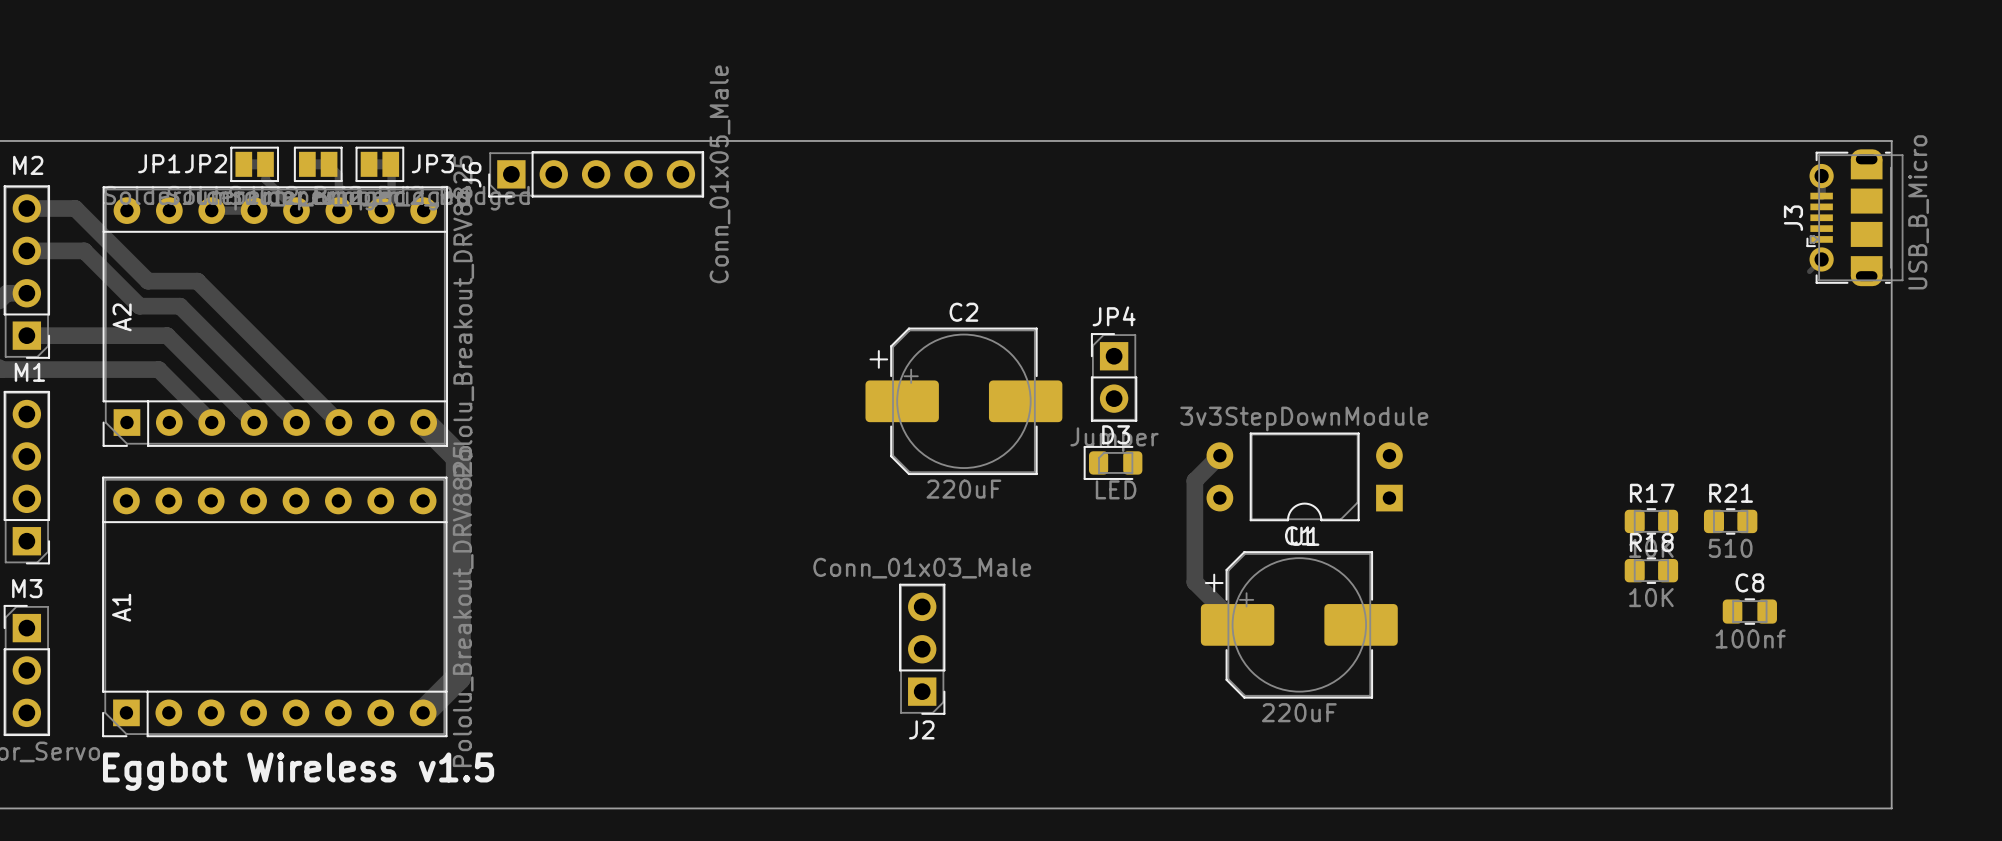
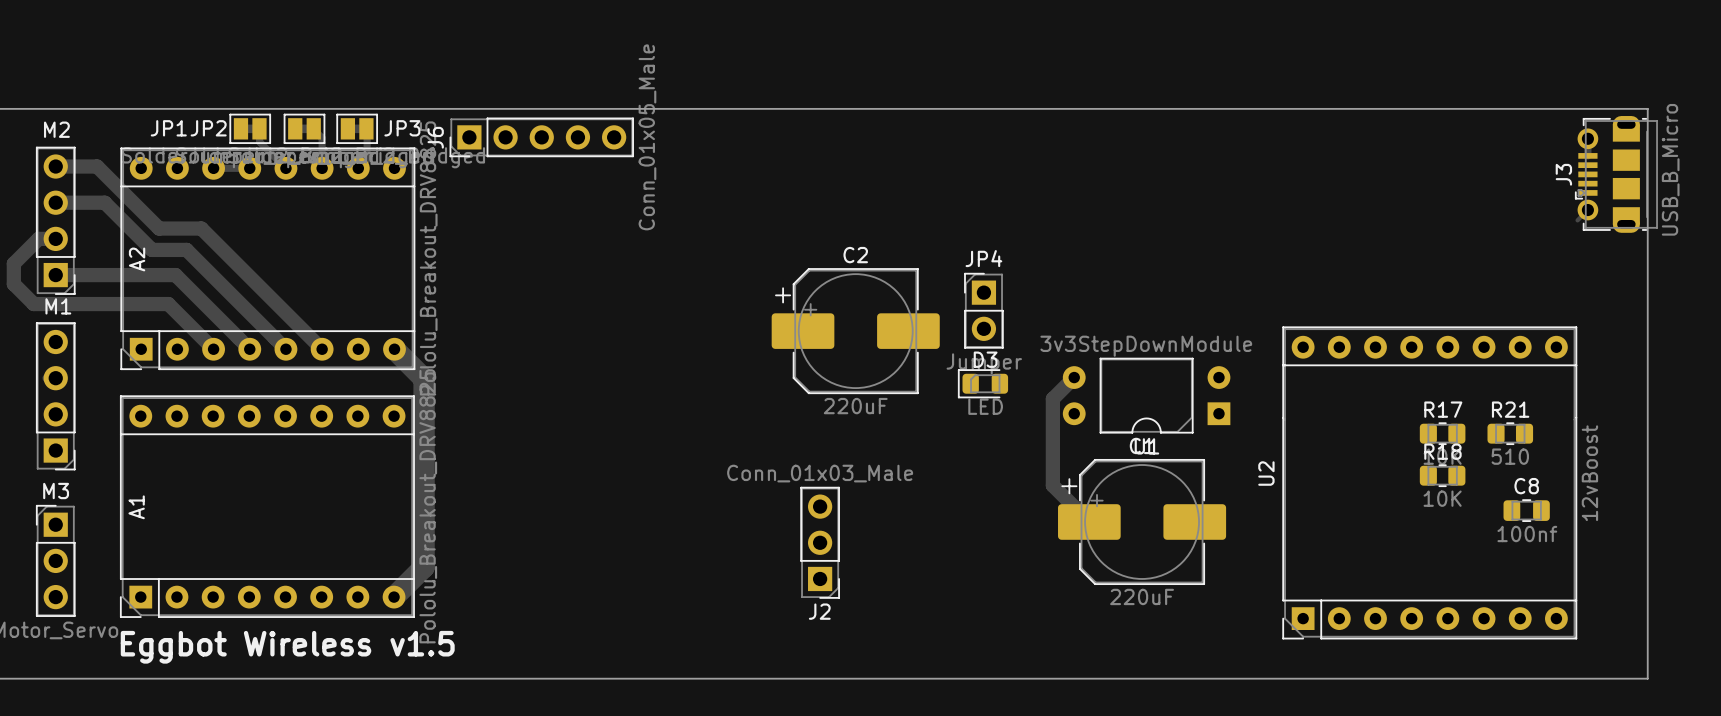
U2: none -> 12vBoost (1429, 482)

